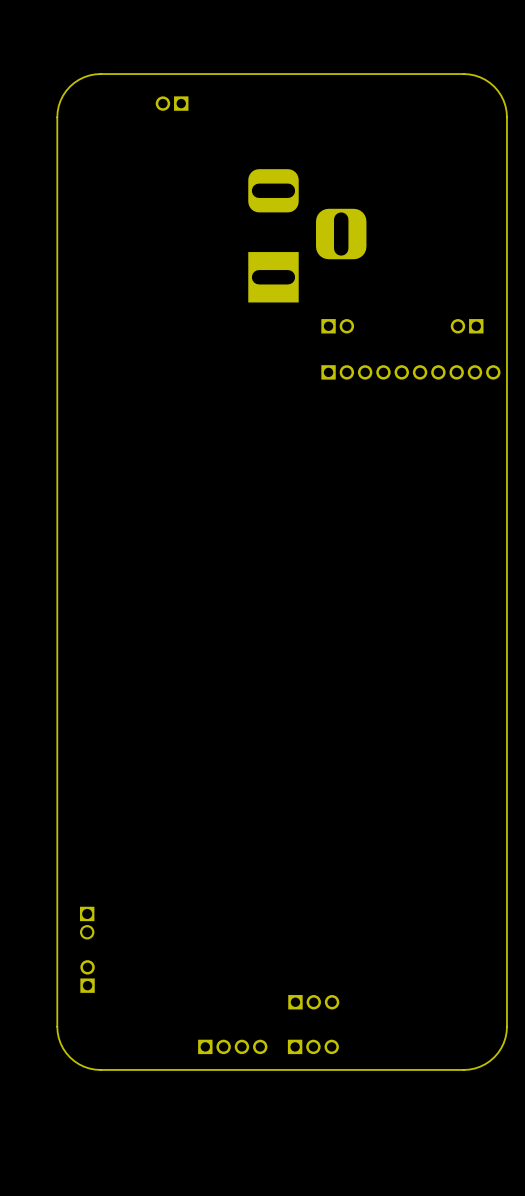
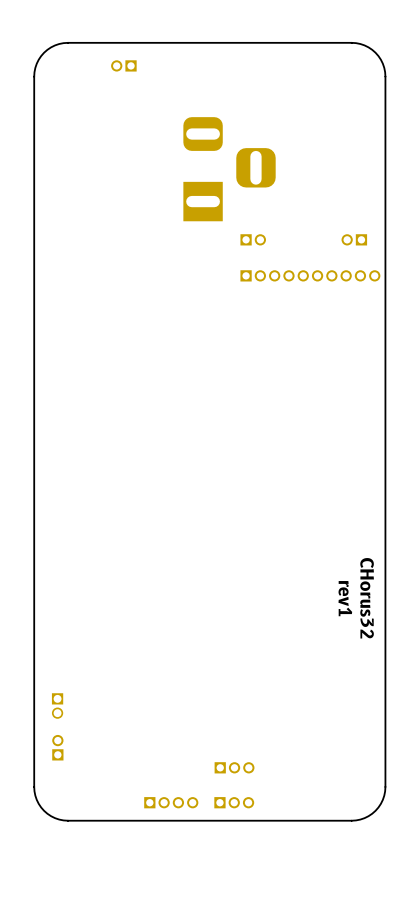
text: none -> rev1 (345, 598)
text: none -> CHorus32 (367, 598)

